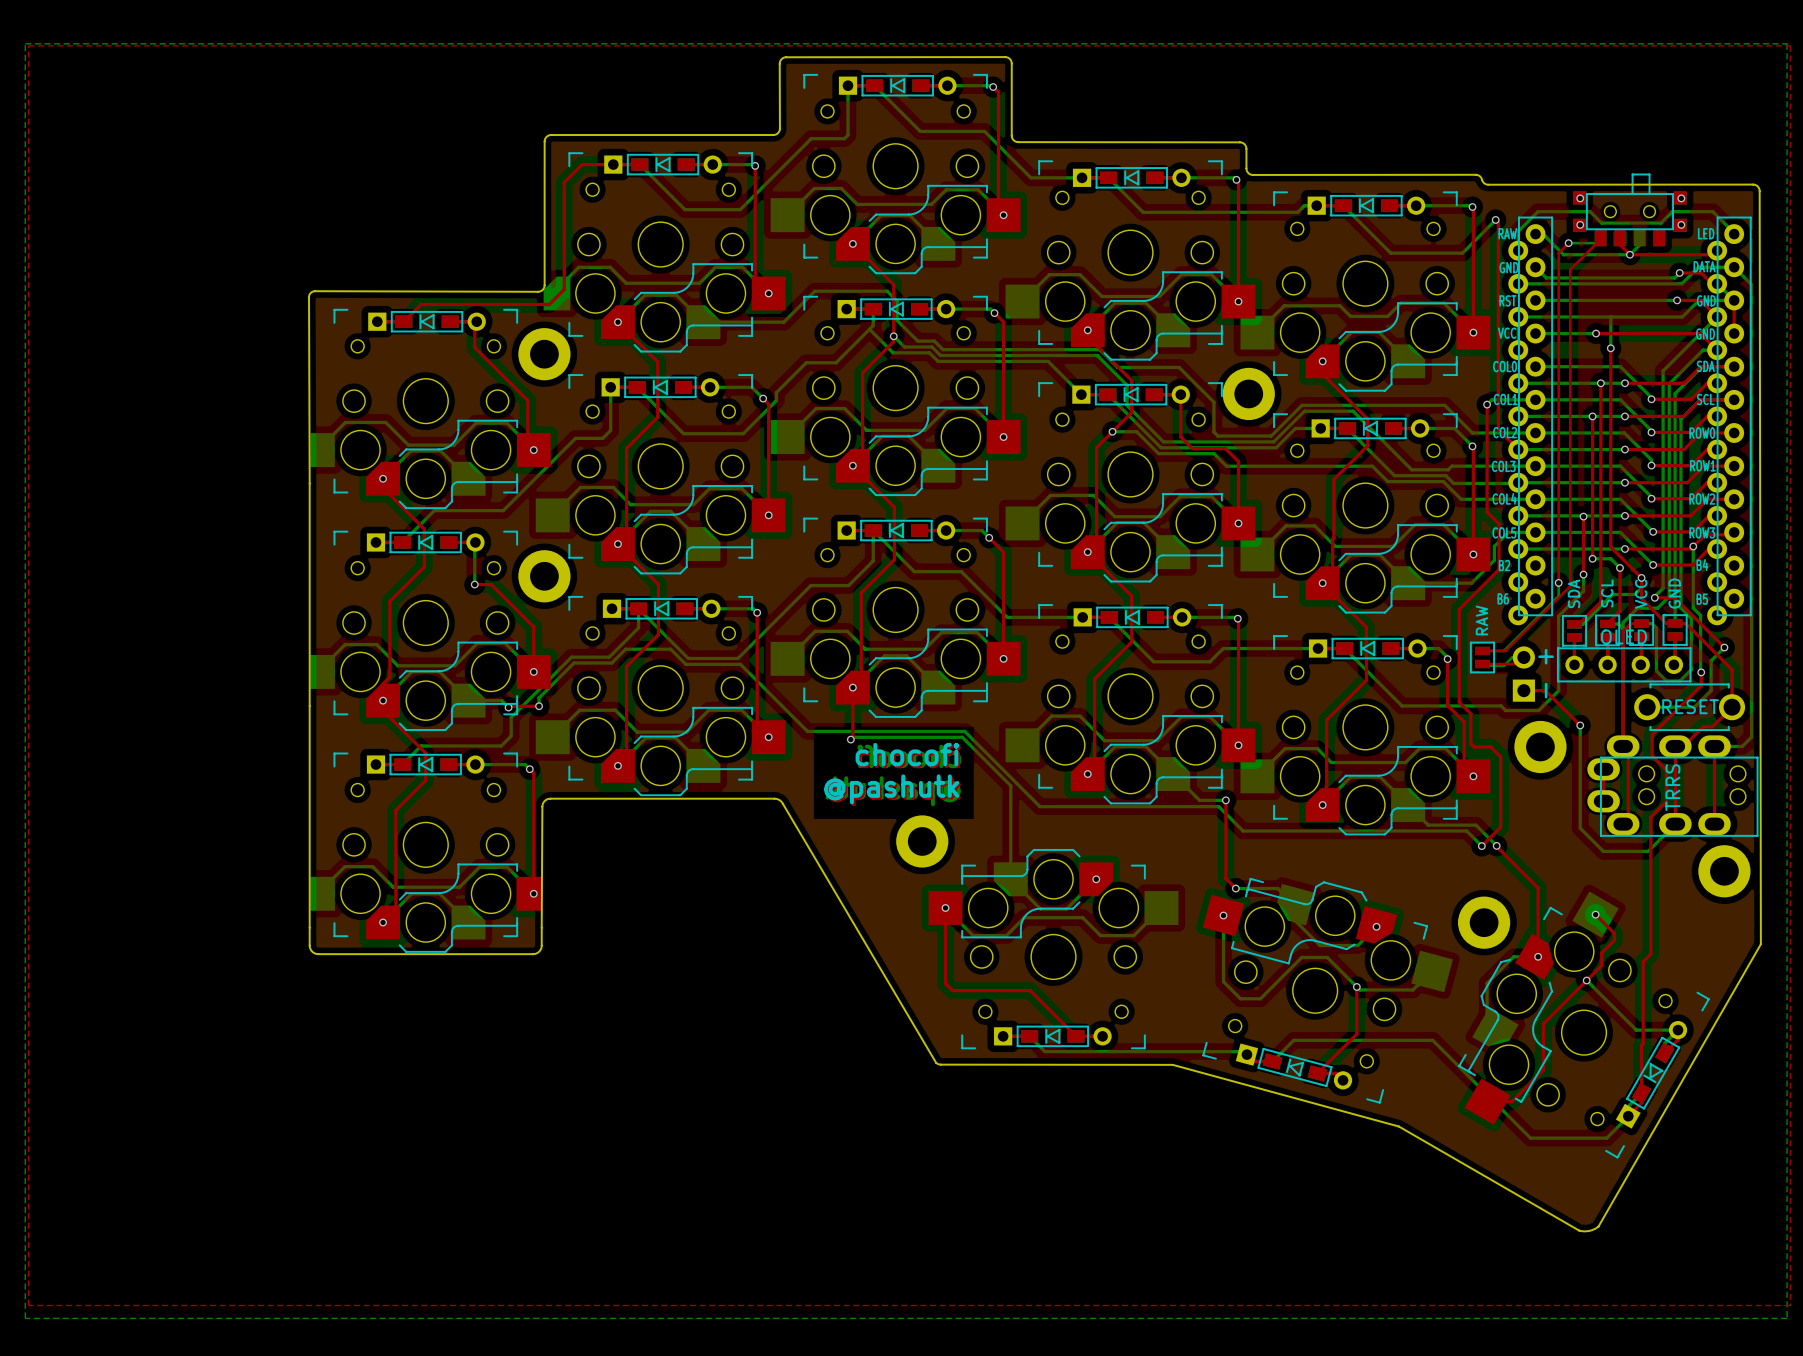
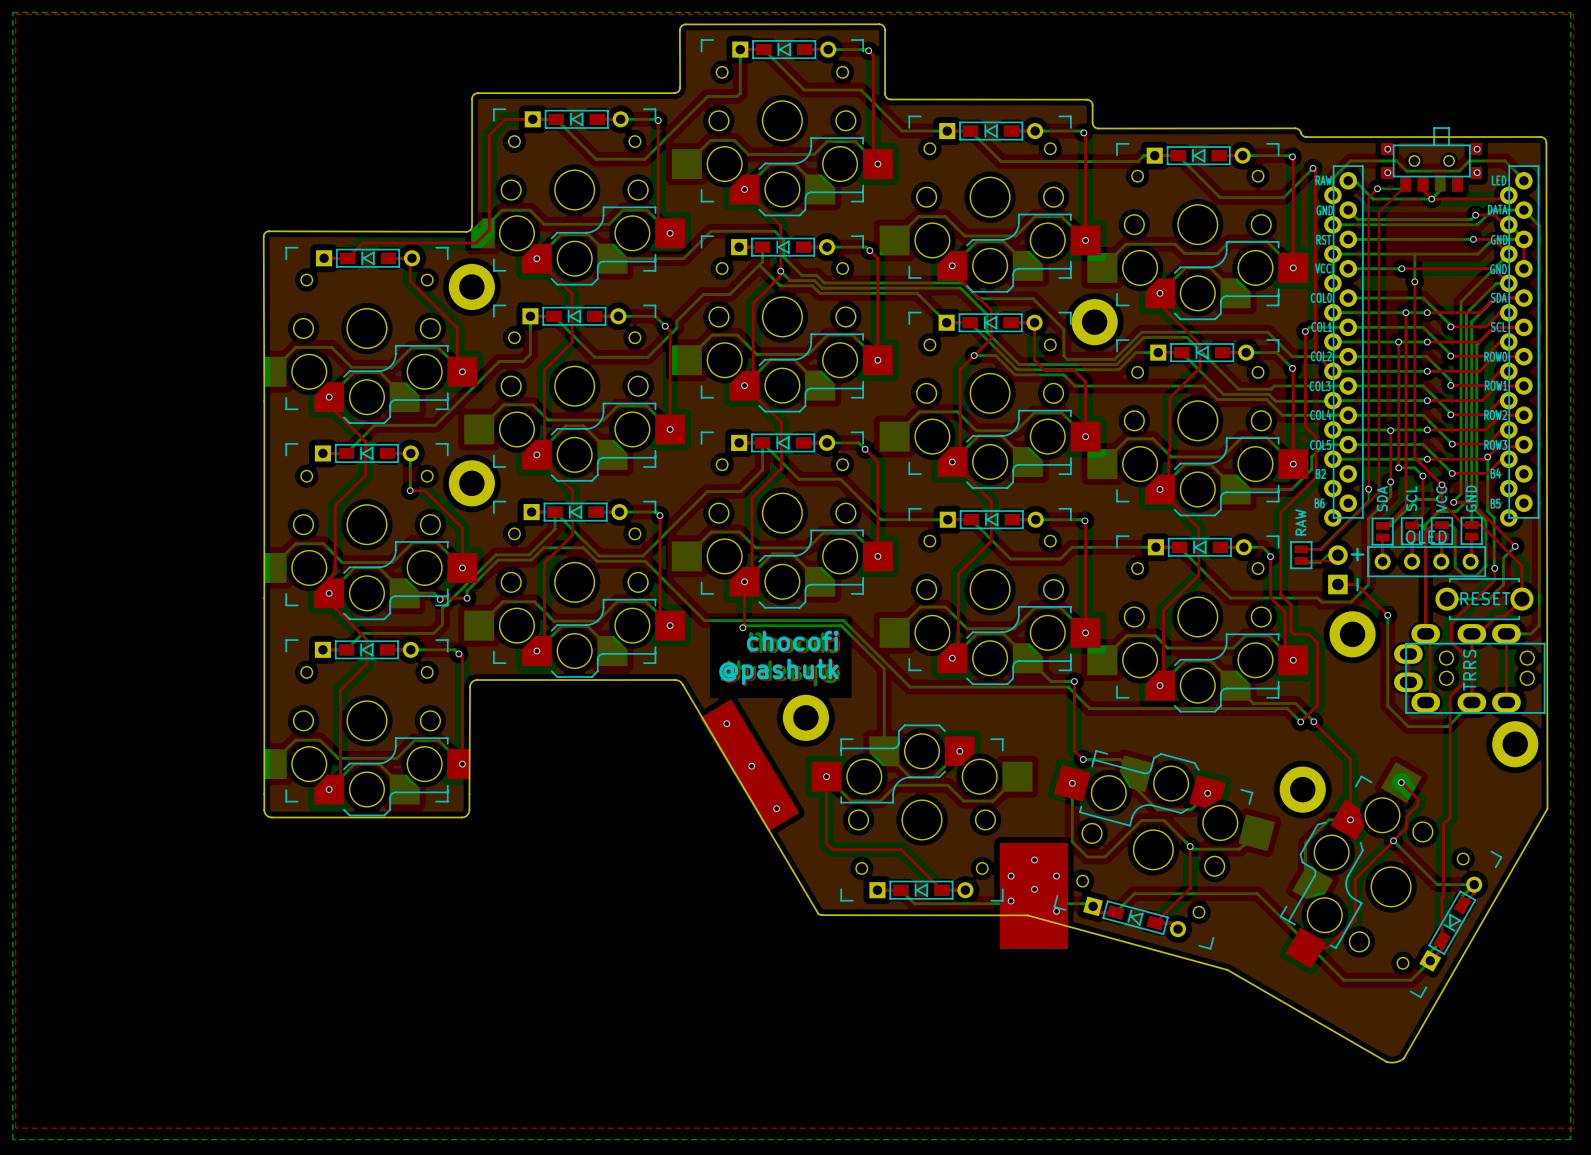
drawing: none -> [700, 699, 799, 832]
via: none -> (726, 723)
via: none -> (751, 766)
via: none -> (776, 808)
drawing: none -> [999, 843, 1068, 949]
via: none -> (1034, 860)
via: none -> (1011, 876)
via: none -> (1056, 876)
via: none -> (1034, 889)
via: none -> (1011, 901)
via: none -> (1056, 911)

